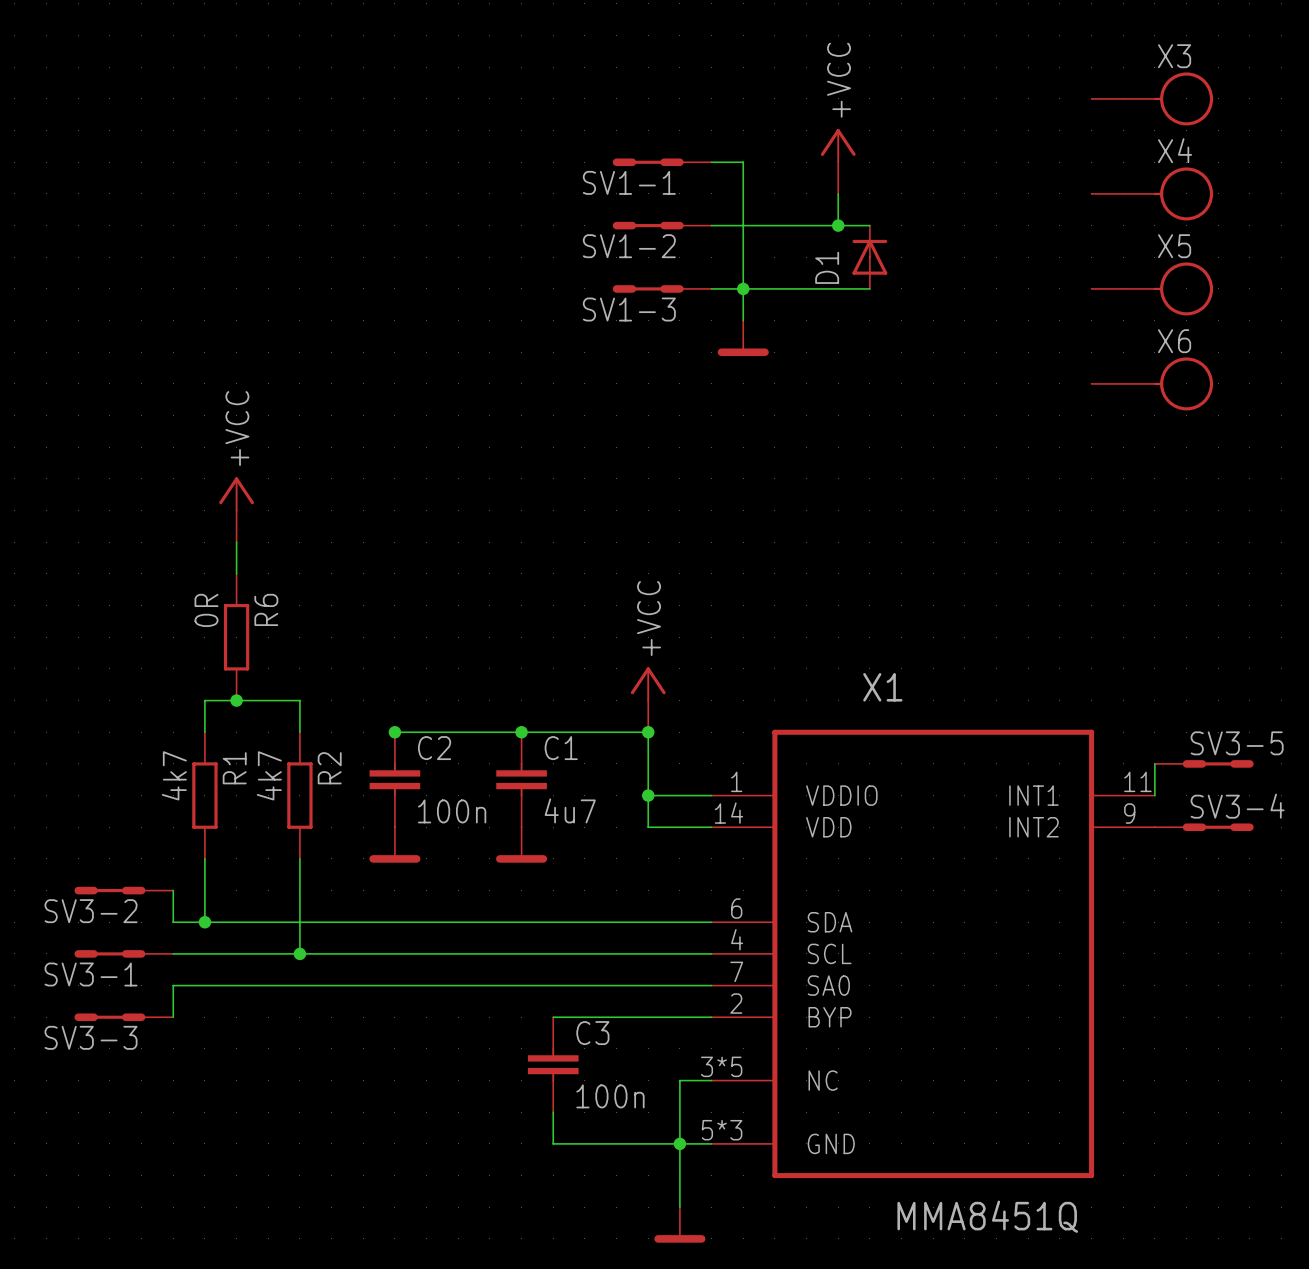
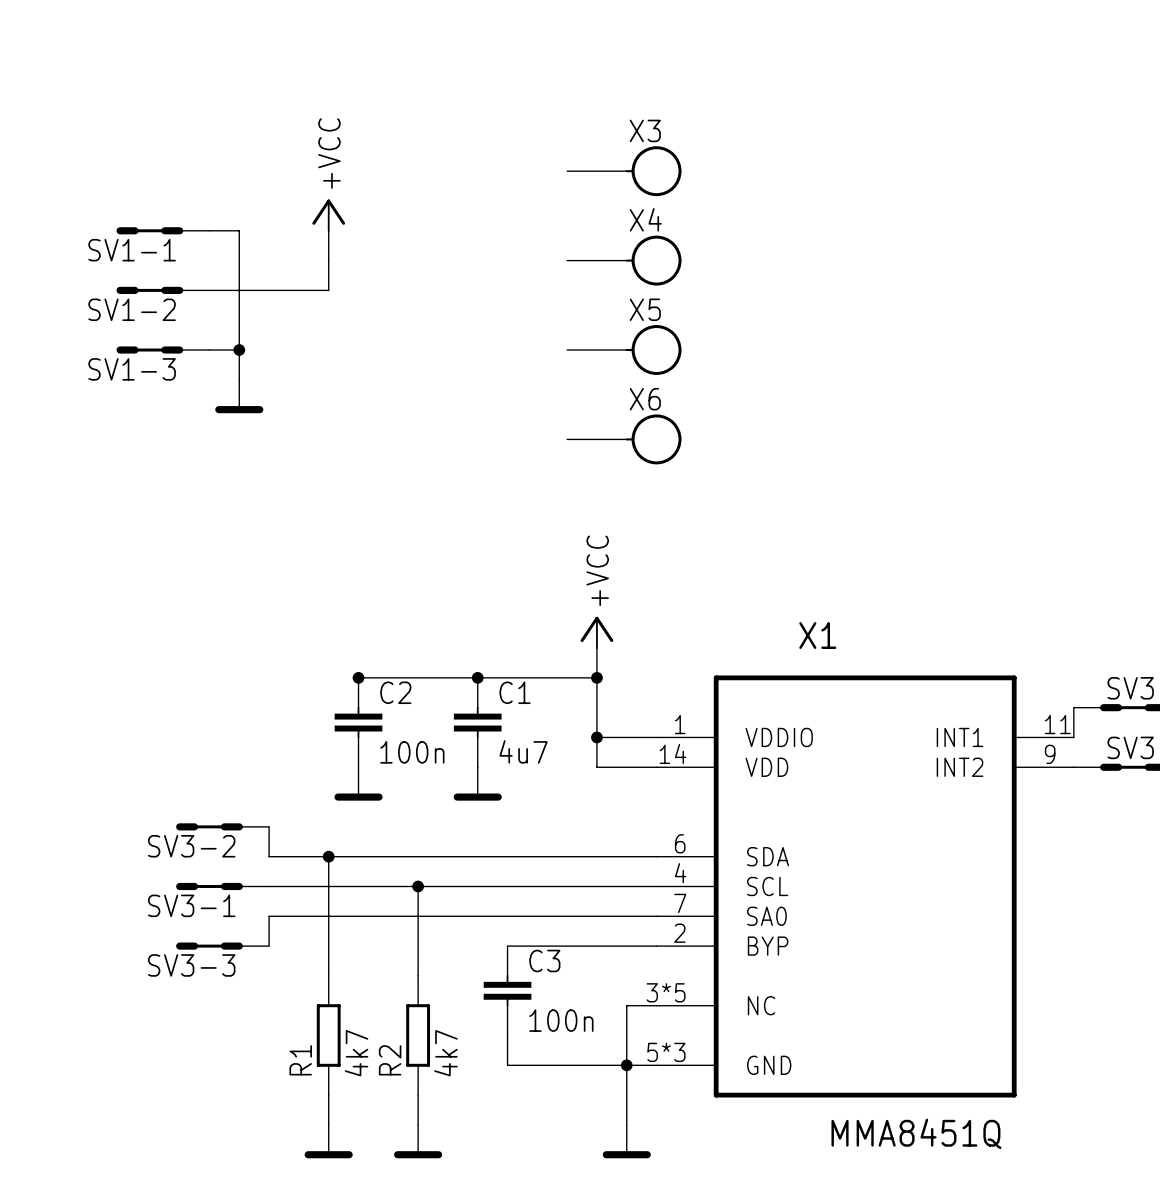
X3 position: (1152, 98) -> (624, 171)
power symbol: +VCC (838, 161) -> none
SV1-1 position: (662, 162) -> (162, 230)
wire: (711, 162) (743, 162) (743, 320) -> none
wire: (838, 193) (838, 225) -> none
X4 position: (1152, 193) -> (624, 260)
SV1-2 position: (662, 225) -> (162, 290)
wire: (711, 225) (869, 225) -> none
junction: (838, 225) -> none
power symbol: none -> +VCC (328, 230)
wire: none -> (209, 230) (239, 230) (239, 379)
D1: (869, 257) -> none
wire: none -> (328, 260) (328, 290) (209, 290)
SV1-3 position: (662, 288) -> (162, 350)
wire: (711, 288) (869, 288) -> none
junction: (743, 288) -> none
X5 position: (1152, 288) -> (624, 350)
power symbol: (743, 338) -> none
wire: none -> (209, 350) (239, 350)
junction: none -> (239, 350)
X6 position: (1152, 383) -> (624, 439)
power symbol: none -> (239, 396)
power symbol: +VCC (236, 509) -> none
wire: (236, 542) (236, 573) -> none
R6: 0R (236, 637) -> none
junction: (236, 700) -> none
wire: (204, 732) (204, 700) (299, 700) (299, 732) -> none
R1 name position: R1 (234, 768) -> R1 (300, 1060)
R2 name position: R2 (329, 768) -> R2 (390, 1060)
R1 value position: 4k7 (174, 775) -> 4k7 (356, 1053)
R2 value position: 4k7 (269, 775) -> 4k7 (445, 1053)
R1 position: (204, 795) -> (328, 1035)
R2 position: (299, 795) -> (418, 1035)
wire: (204, 858) (204, 922) -> none
wire: (299, 858) (299, 890) -> none
SV3-2 position: (123, 890) -> (222, 826)
wire: (173, 890) (173, 922) (299, 922) (299, 953) (173, 953) -> none
junction: (204, 922) -> none
wire: none -> (328, 856) (328, 975)
SV3-1 position: (123, 953) -> (222, 886)
junction position: (299, 953) -> (328, 856)
wire: none -> (418, 886) (418, 975)
junction: none -> (418, 886)
wire: (299, 985) (173, 985) (173, 1017) -> (269, 916) (269, 946)
SV3-3 position: (123, 1017) -> (222, 946)
wire: none -> (328, 1095) (328, 1124)
wire: none -> (418, 1095) (418, 1124)
power symbol: none -> (328, 1141)
power symbol: none -> (418, 1141)

